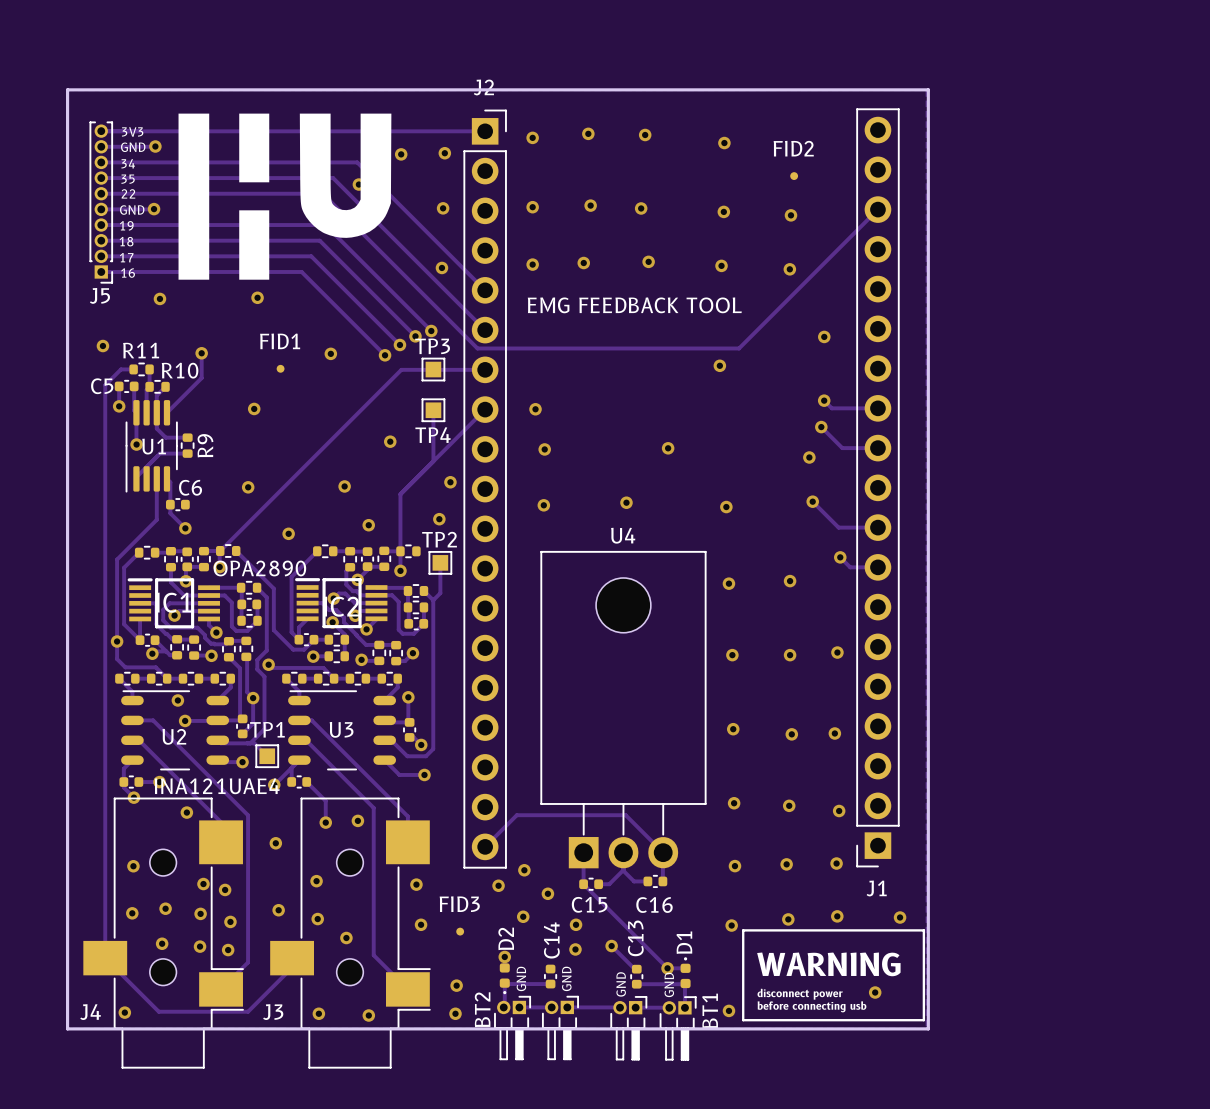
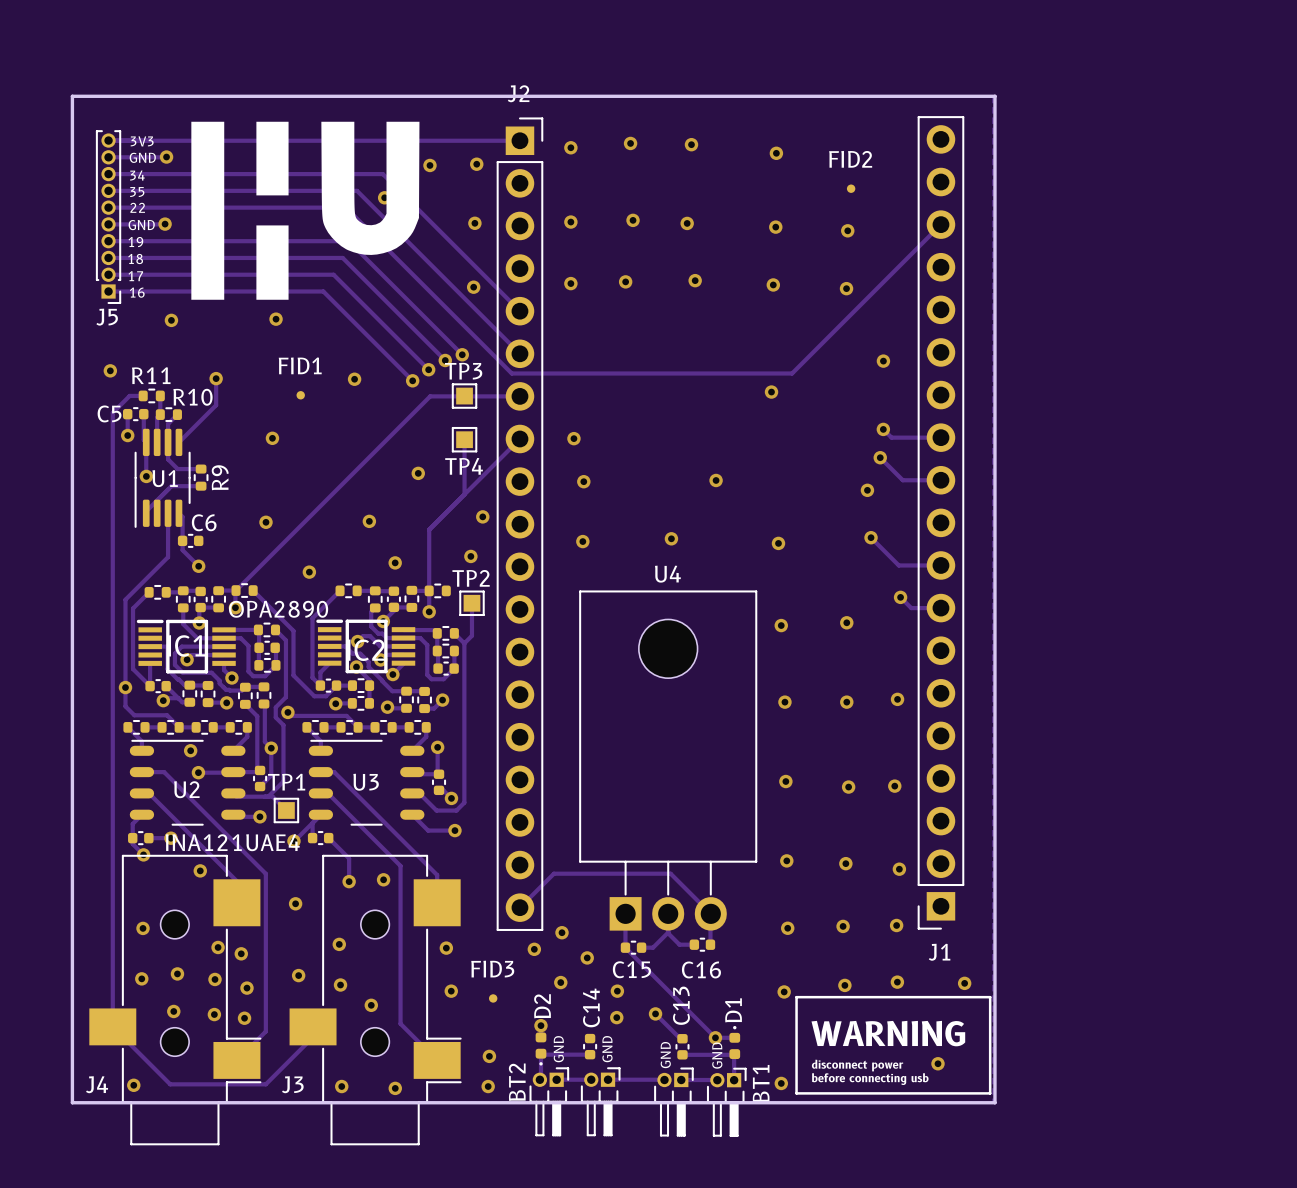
text: EMG FEEDBACK TOOL (634, 305) -> none

